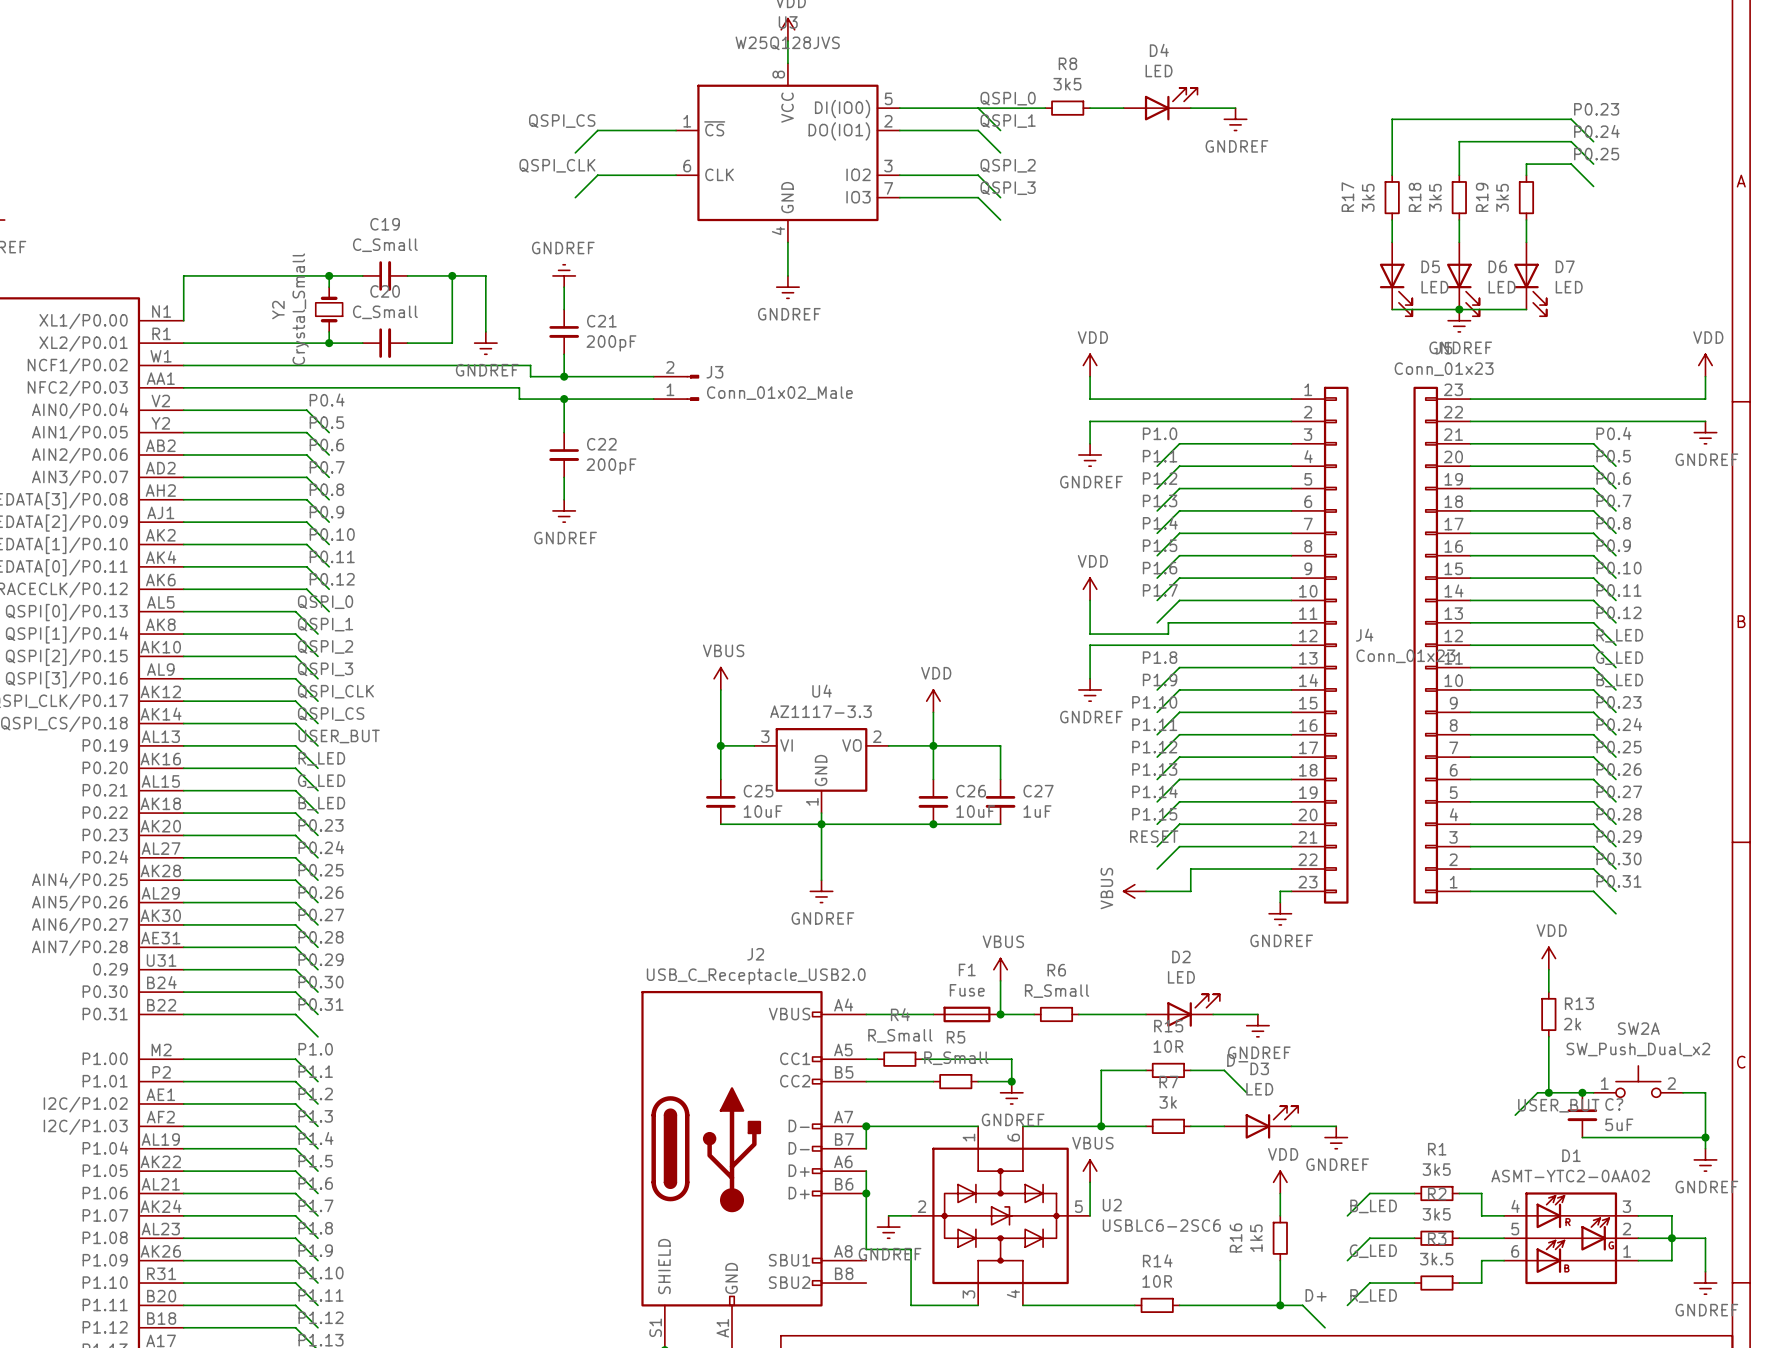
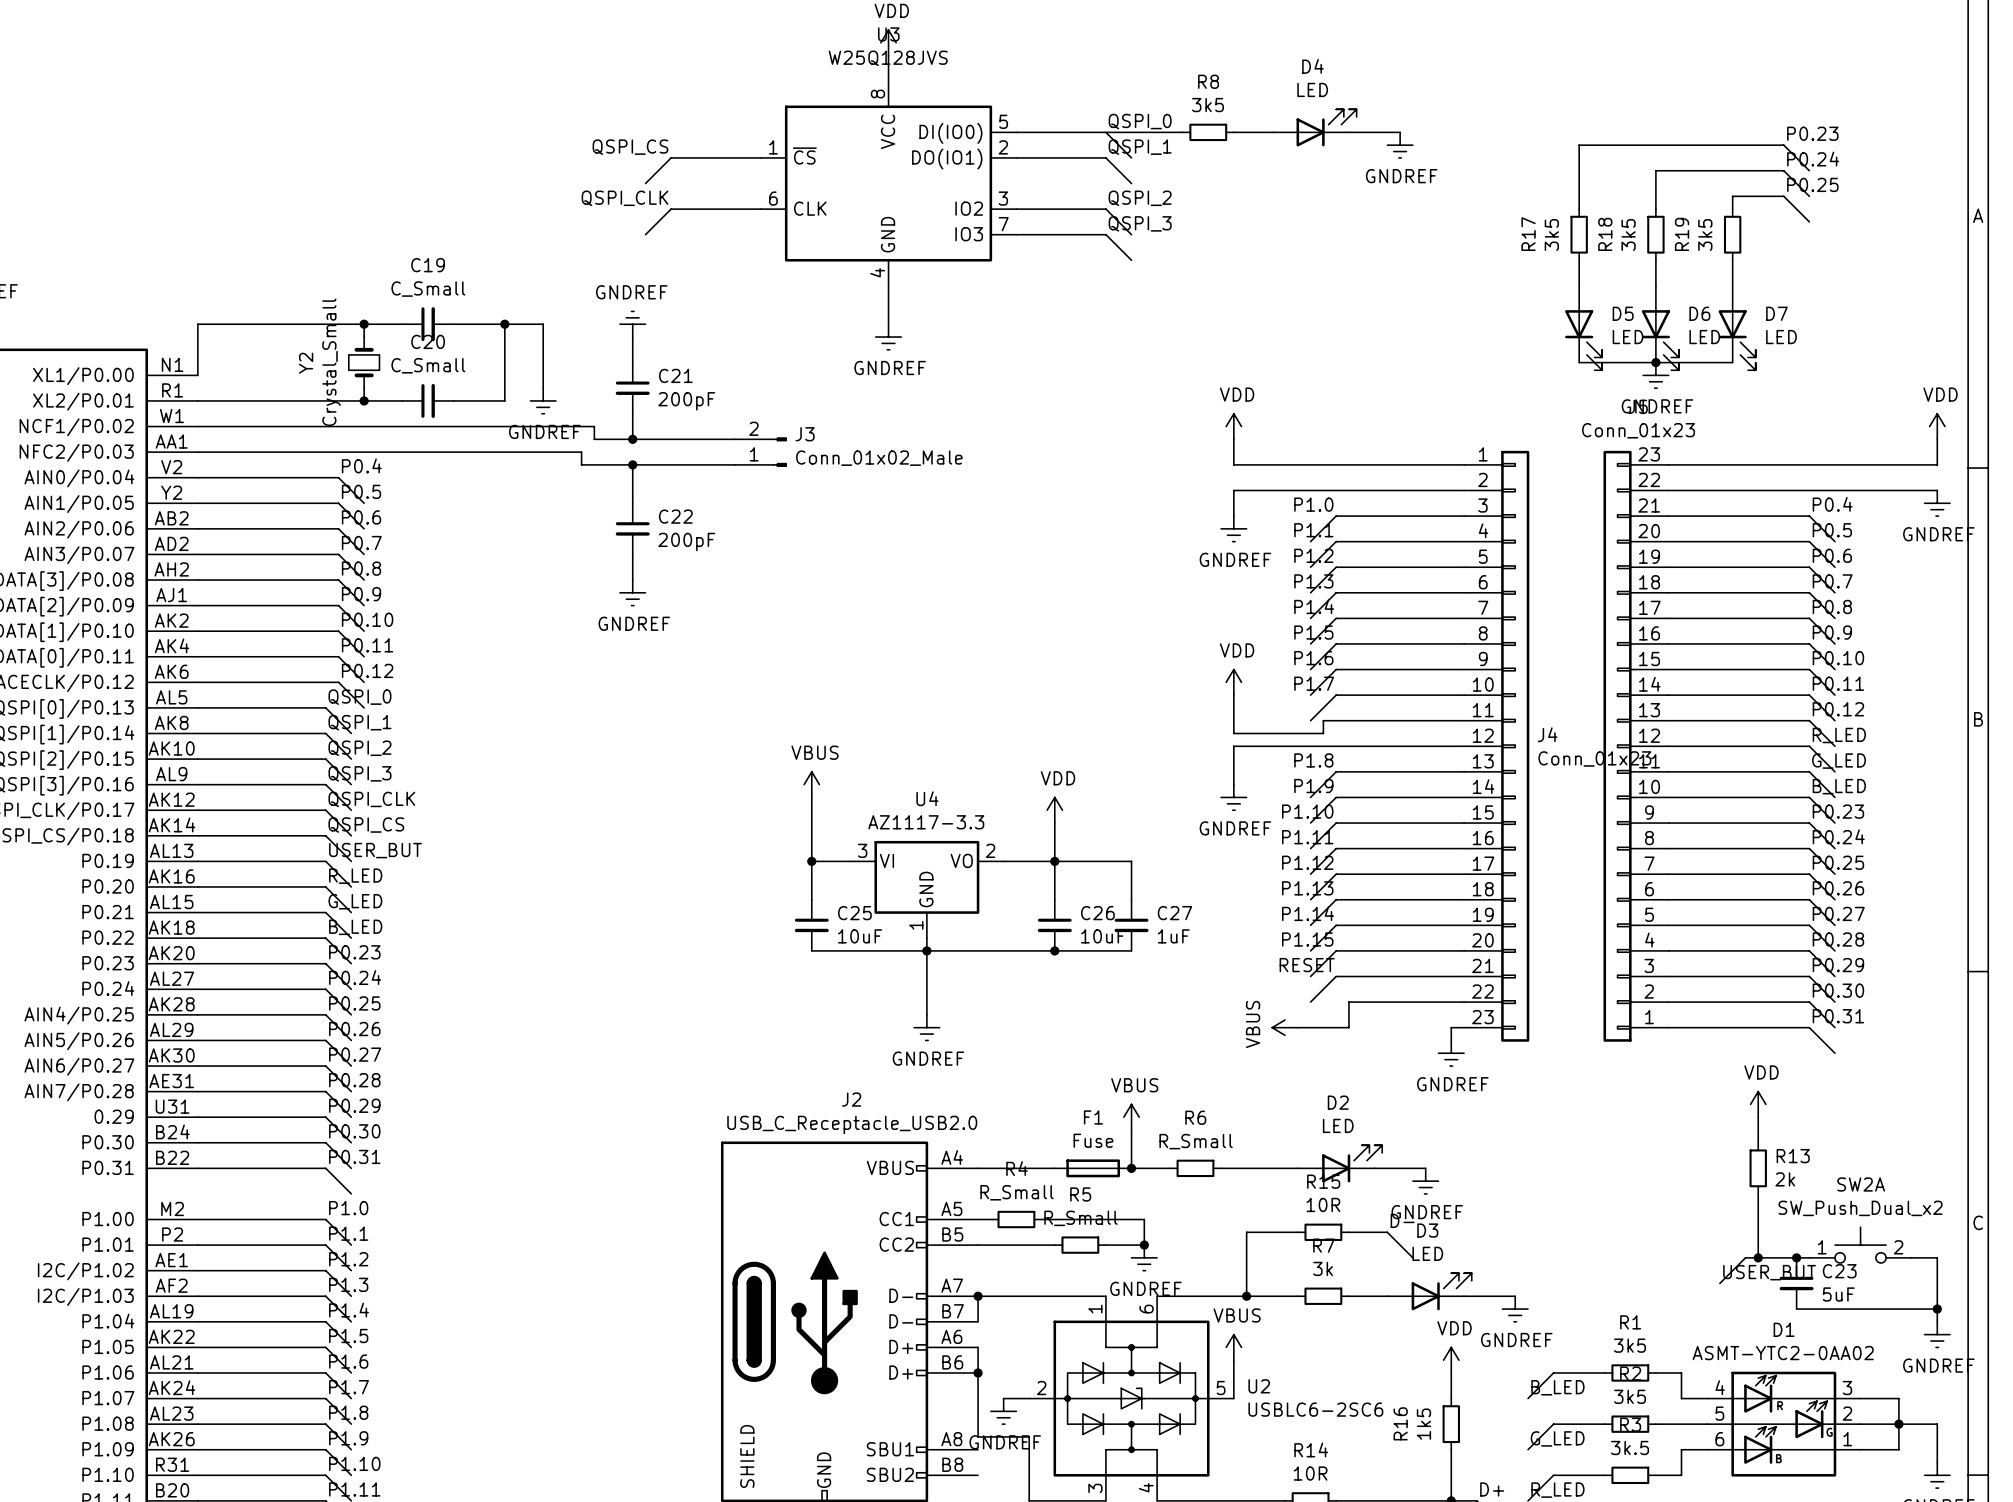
C? name: C? (1614, 1104) -> C23 (1839, 1271)

